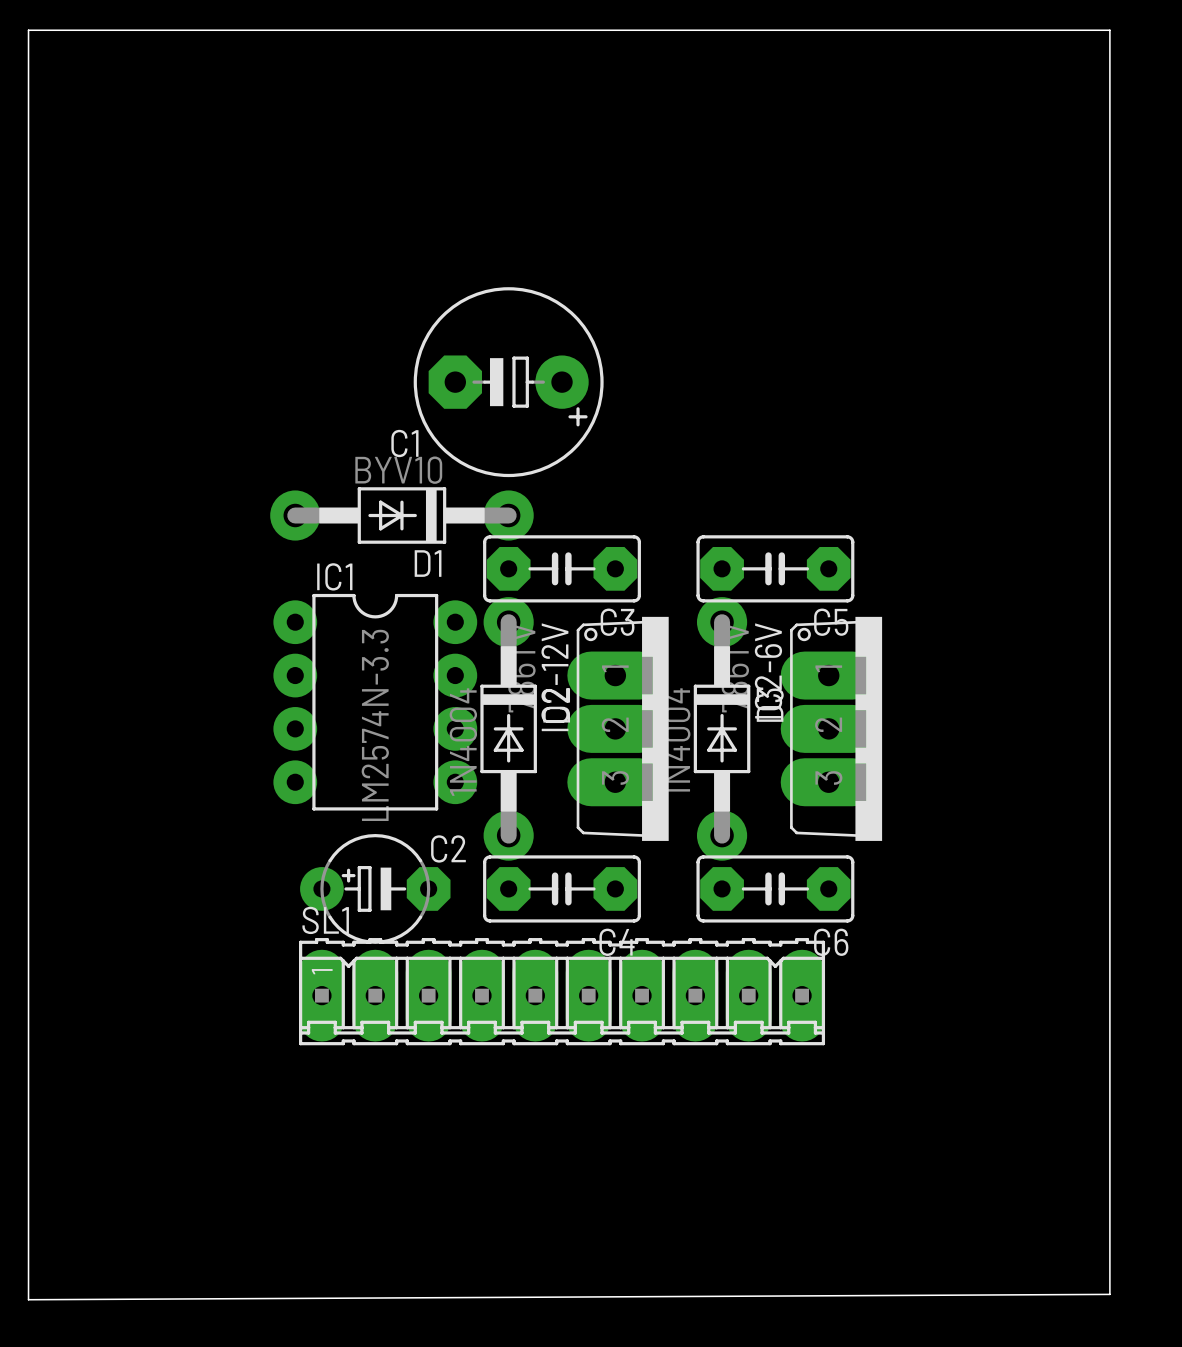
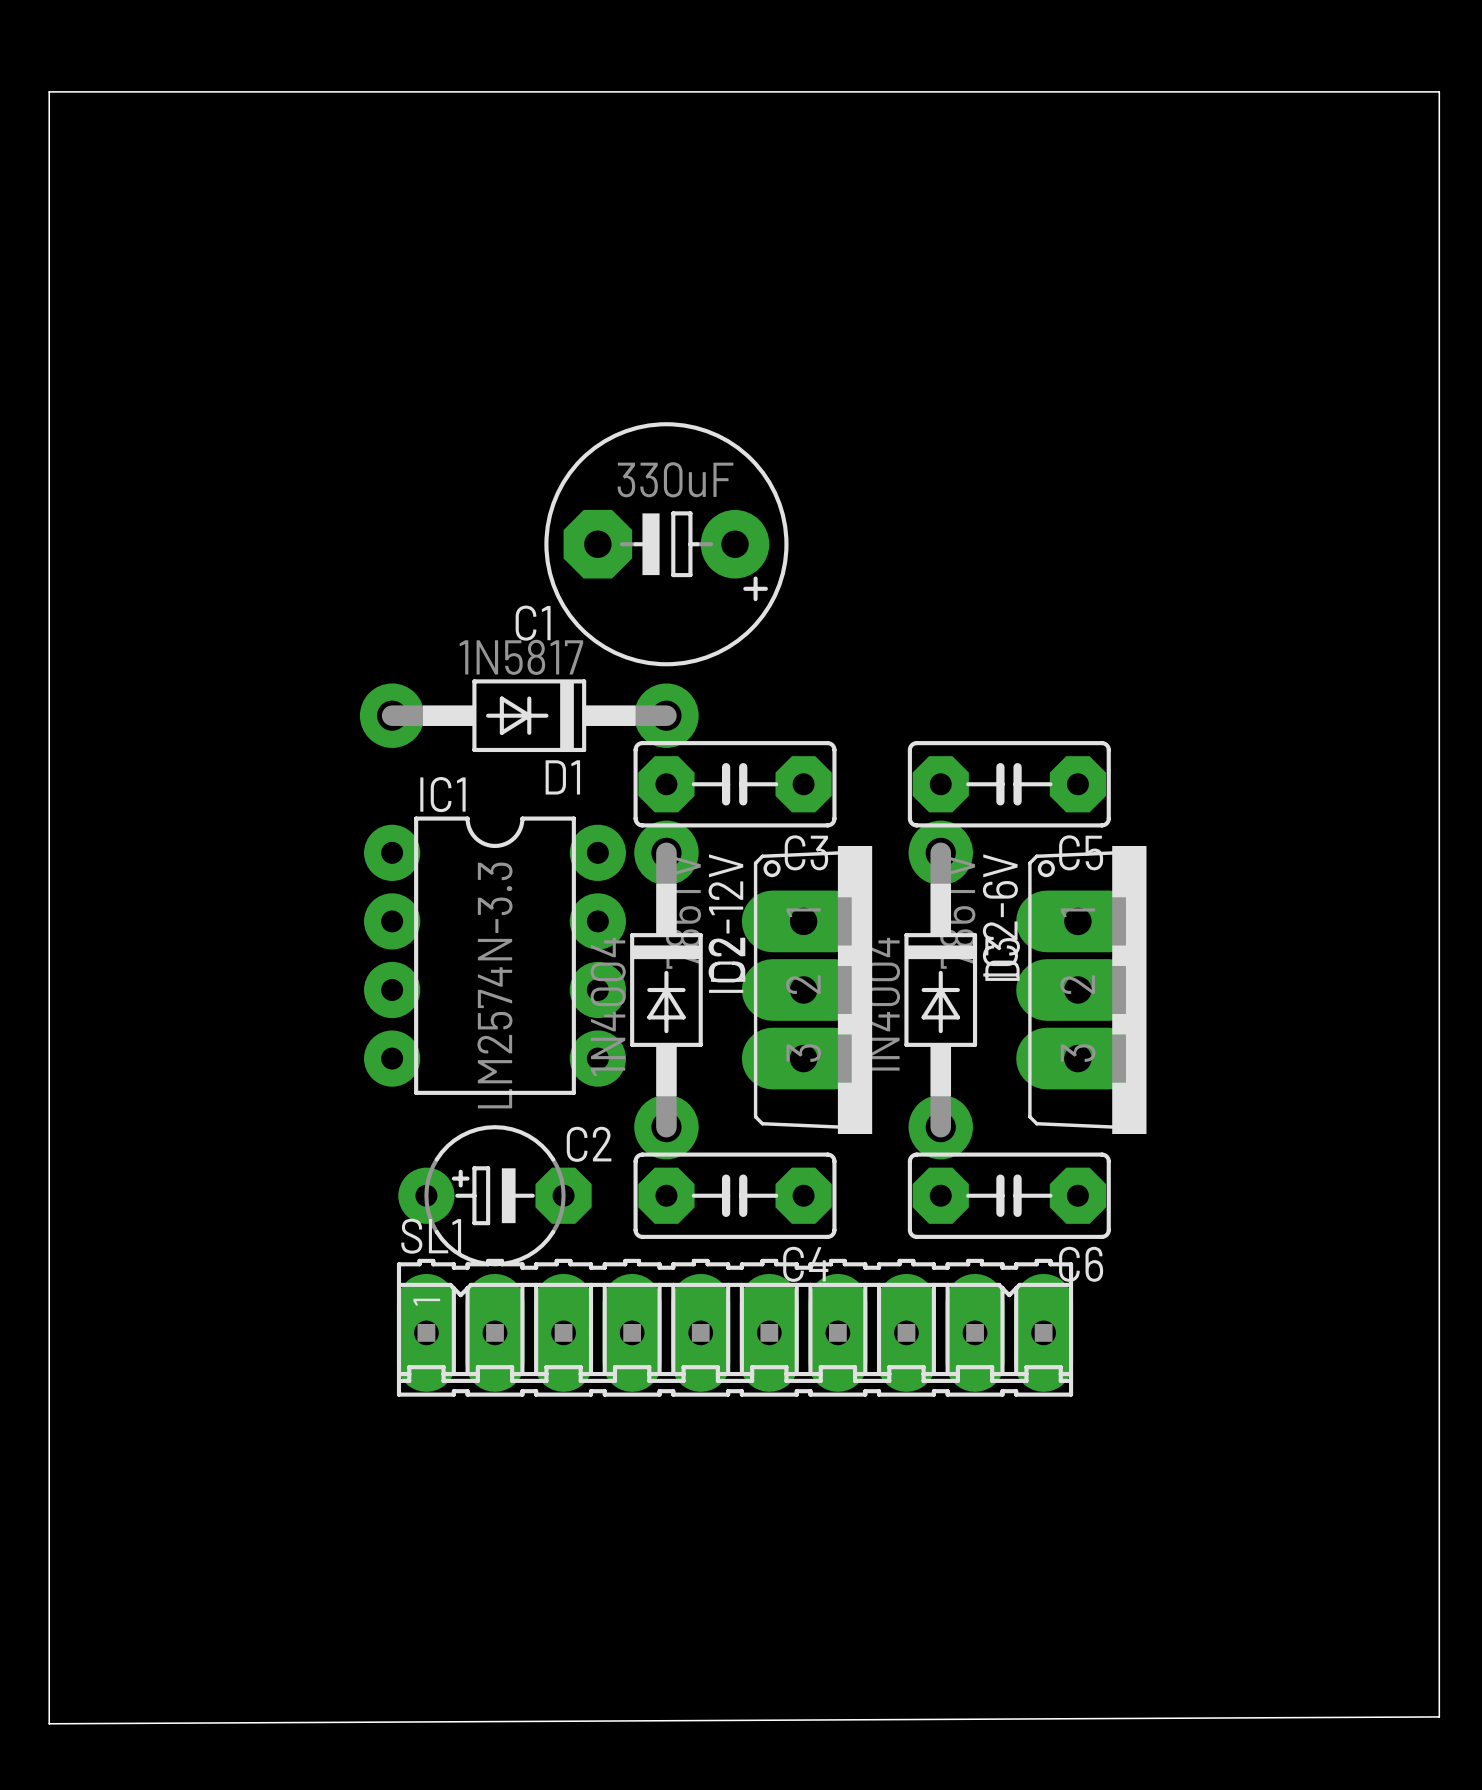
C1 value: none -> 330uF (675, 479)
D1 value: BYV10 (398, 470) -> 1N5817 (521, 657)

